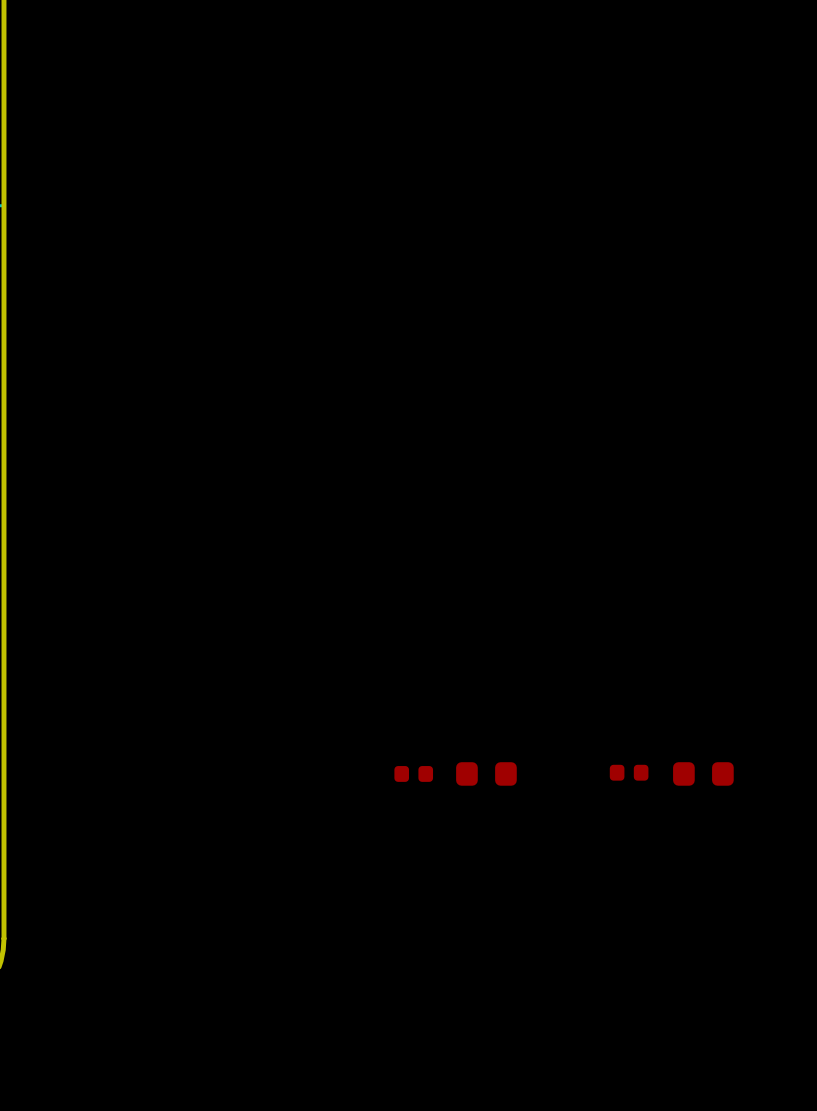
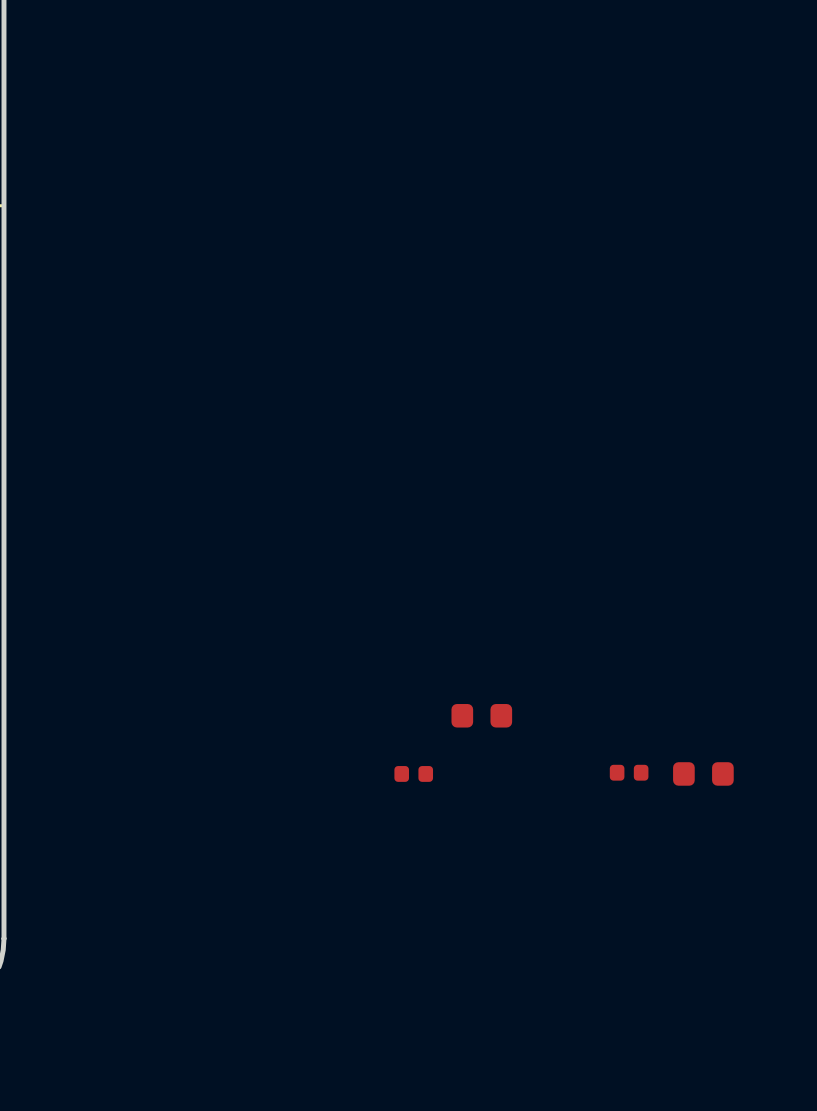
part position: (486, 773) -> (481, 715)

